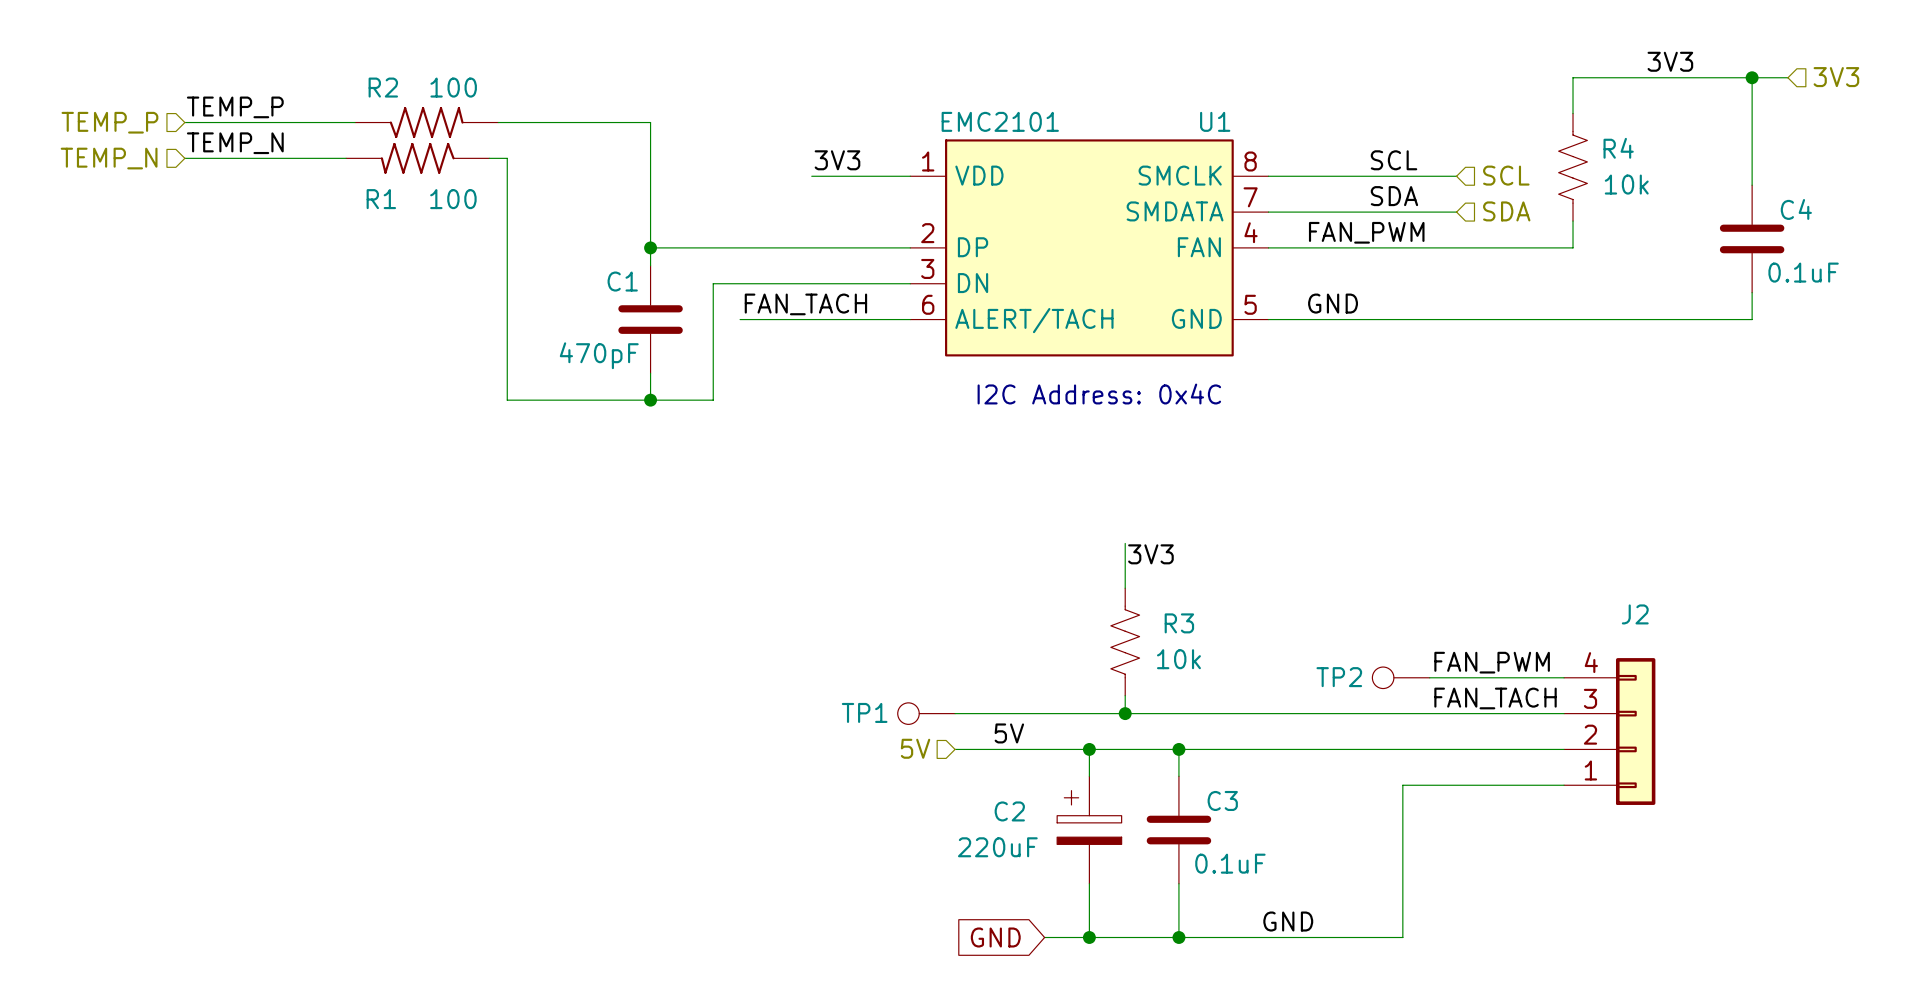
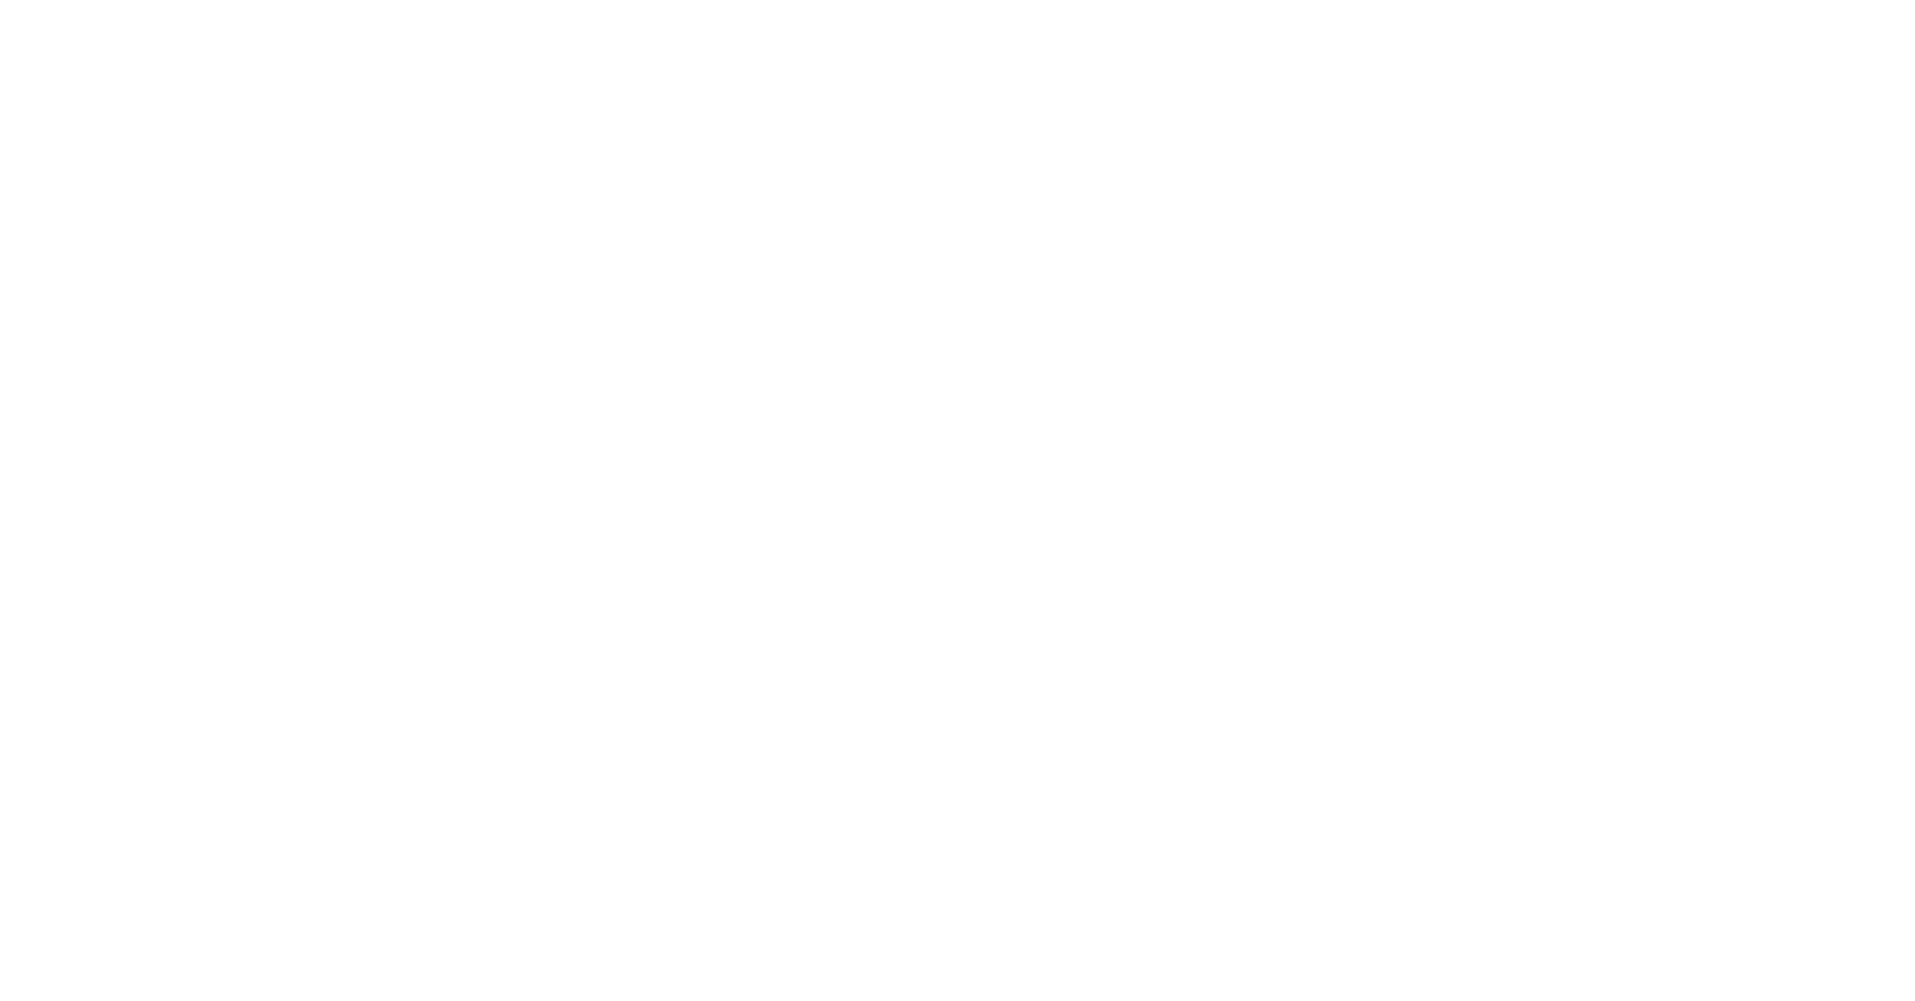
label: 3V3 (1670, 61) -> none
wire: (1752, 77) (1752, 185) -> none
junction: (1752, 77) -> none
wire: (1787, 77) (1573, 77) (1573, 113) -> none
hierarchical label: 3V3 (1836, 77) -> none
label: TEMP_P (235, 107) -> none
hierarchical label: TEMP_P (109, 122) -> none
wire: (184, 122) (355, 122) -> none
R2: 100 (426, 122) -> none
wire: (498, 122) (650, 122) (650, 265) -> none
label: TEMP_N (235, 143) -> none
hierarchical label: TEMP_N (109, 158) -> none
wire: (184, 158) (346, 158) -> none
R1: 100 (417, 158) -> none
wire: (489, 158) (507, 158) (507, 400) (713, 400) (713, 283) (910, 283) -> none
label: 3V3 (837, 160) -> none
label: SCL (1394, 160) -> none
R4: 10k (1573, 167) -> none
hierarchical label: SCL (1506, 175) -> none
wire: (811, 176) (910, 176) -> none
wire: (1268, 176) (1456, 176) -> none
label: SDA (1394, 196) -> none
hierarchical label: SDA (1506, 211) -> none
wire: (1268, 212) (1456, 212) -> none
wire: (1573, 221) (1573, 247) (1268, 247) -> none
label: FAN_PWM (1366, 232) -> none
C4: 0.1uF (1752, 238) -> none
wire: (650, 247) (910, 247) -> none
junction: (650, 247) -> none
U1: EMC2101 (1089, 247) -> none
wire: (1752, 292) (1752, 319) (1268, 319) -> none
label: GND (1333, 303) -> none
label: FAN_TACH (805, 304) -> none
C1: 470pF (650, 319) -> none
wire: (740, 319) (910, 319) -> none
wire: (650, 373) (650, 400) -> none
text: I2C Address: 0x4C (1099, 394) -> none
junction: (650, 400) -> none
wire: (1125, 543) (1125, 588) -> none
label: 3V3 (1150, 554) -> none
R3: 10k (1125, 641) -> none
label: FAN_PWM (1492, 662) -> none
TP2: (1401, 677) -> none
wire: (1429, 677) (1564, 677) -> none
wire: (1125, 695) (1125, 713) -> none
label: FAN_TACH (1495, 698) -> none
TP1: (926, 713) -> none
wire: (955, 713) (1564, 713) -> none
junction: (1125, 713) -> none
J2: (1609, 731) -> none
label: 5V (1009, 733) -> none
hierarchical label: 5V (915, 748) -> none
wire: (955, 749) (1564, 749) -> none
wire: (1089, 749) (1089, 776) -> none
junction: (1089, 749) -> none
wire: (1178, 749) (1178, 776) -> none
junction: (1178, 749) -> none
wire: (1564, 785) (1402, 785) (1402, 937) (1044, 937) -> none
C2: 220uF (1089, 830) -> none
C3: 0.1uF (1178, 830) -> none
wire: (1089, 883) (1089, 937) -> none
wire: (1178, 883) (1178, 937) -> none
label: GND (1288, 921) -> none
global label: GND (995, 937) -> none
junction: (1089, 937) -> none
junction: (1178, 937) -> none

